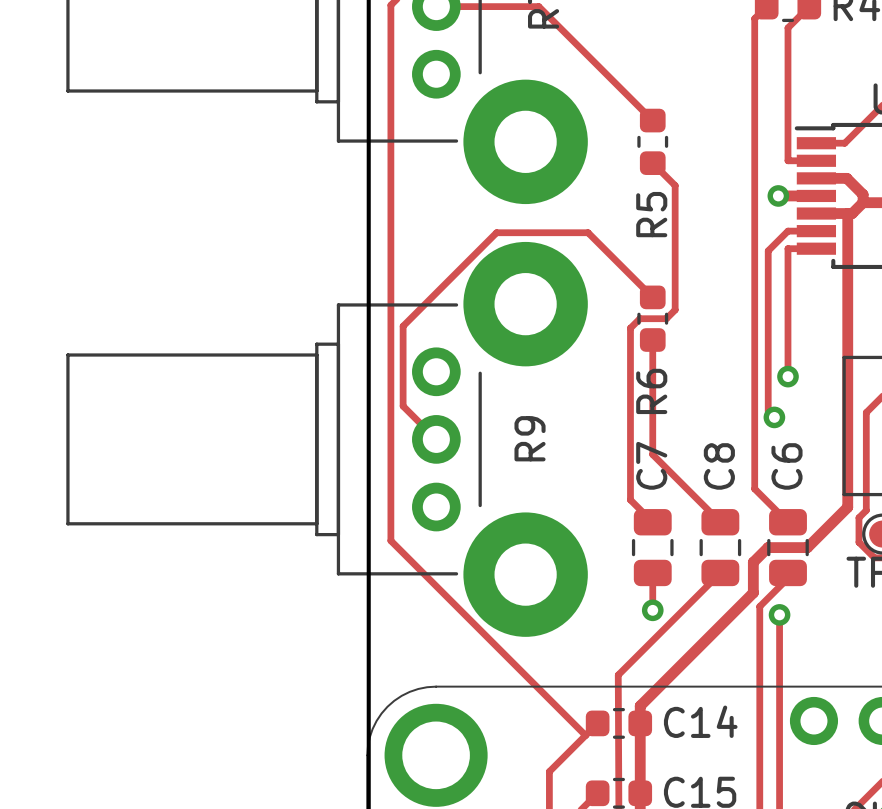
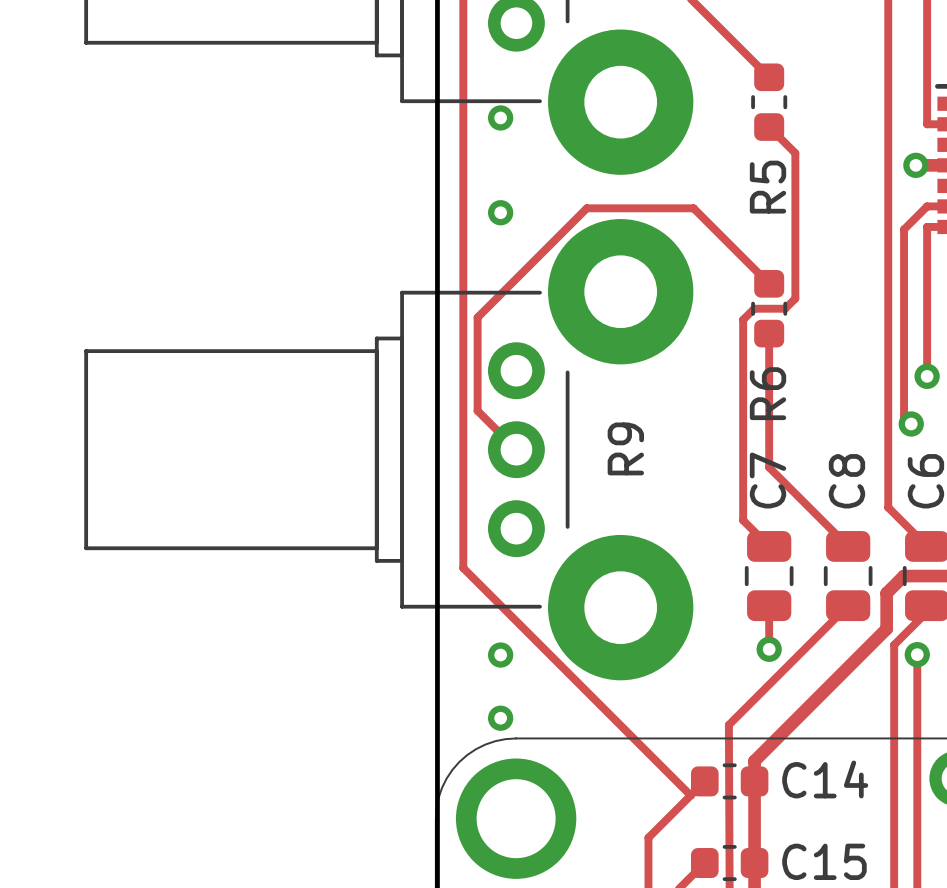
via: none -> (500, 117)
via: none -> (500, 212)
via: none -> (500, 655)
via: none -> (500, 718)

